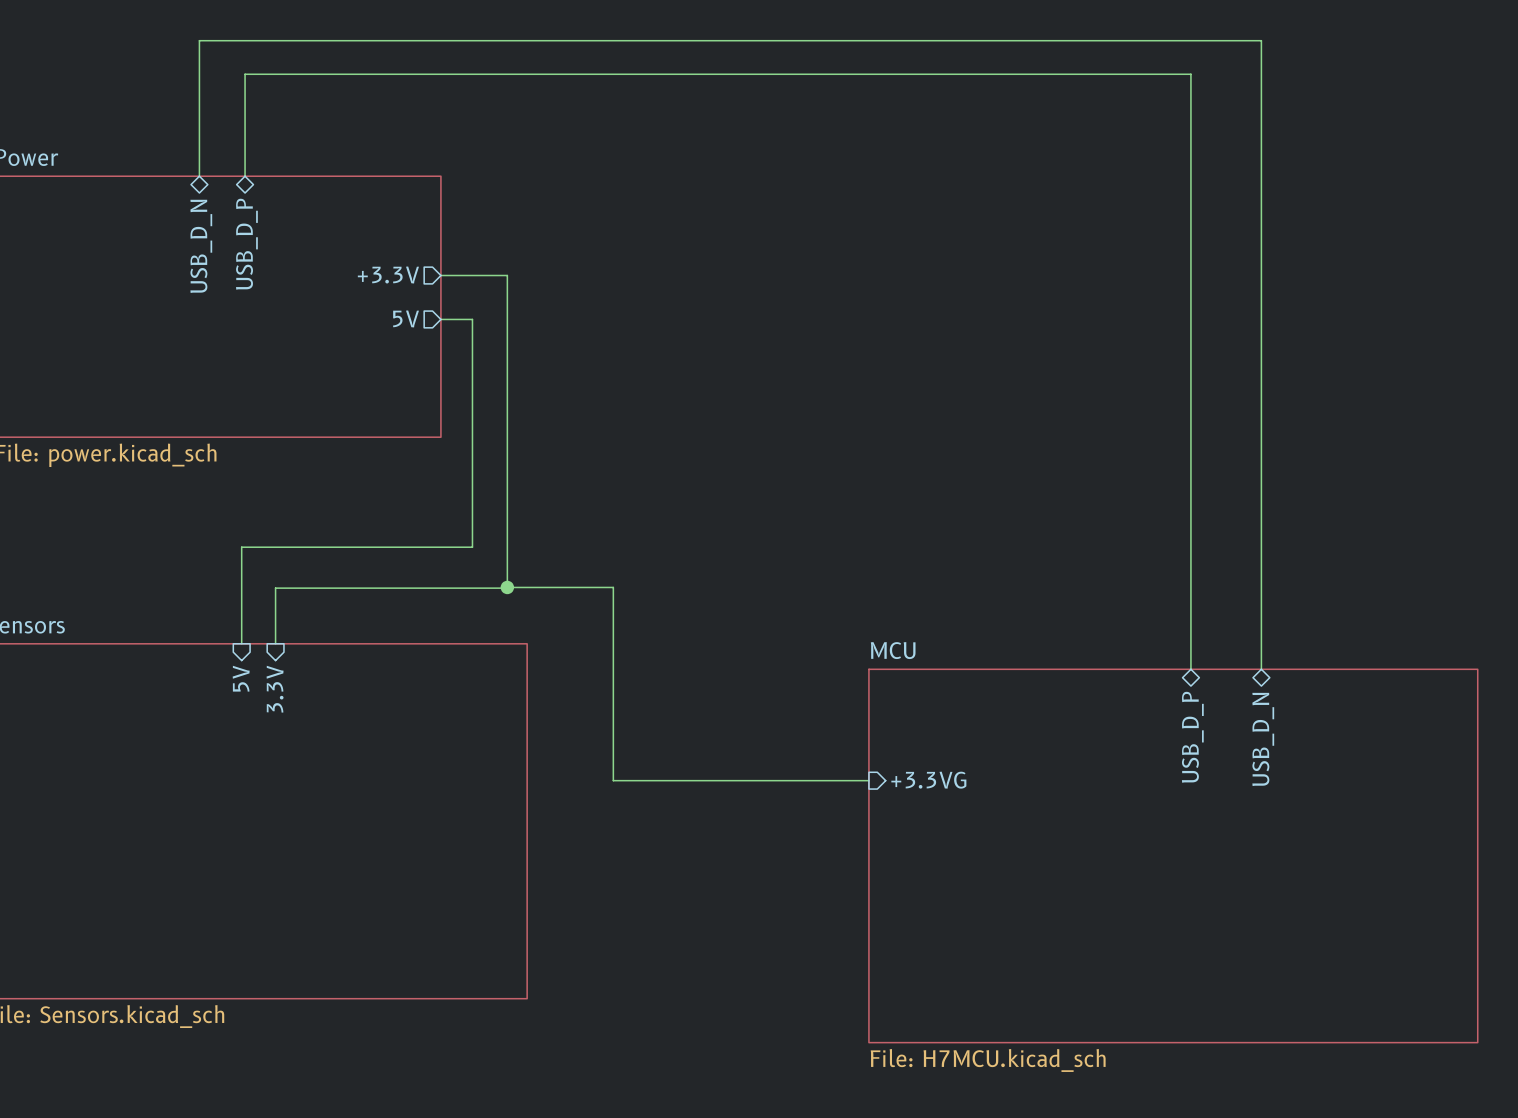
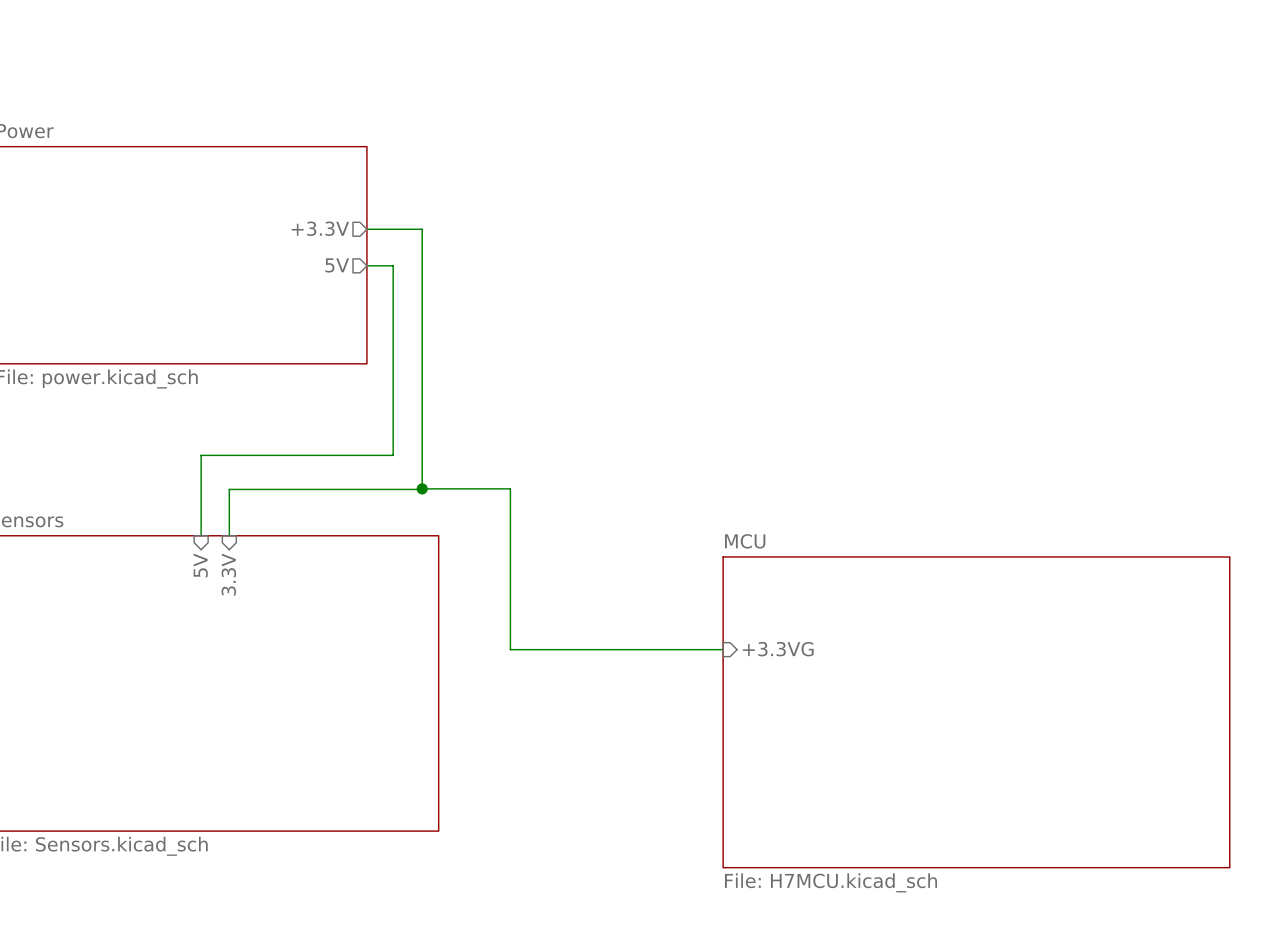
wire: (199, 176) (199, 40) (1261, 40) (1261, 669) -> none
wire: (245, 176) (245, 74) (1190, 74) (1190, 669) -> none
sheet pin: USB_D_P (246, 244) -> none
sheet pin: USB_D_N (201, 246) -> none
sheet pin: USB_D_P (1192, 737) -> none
sheet pin: USB_D_N (1263, 739) -> none

